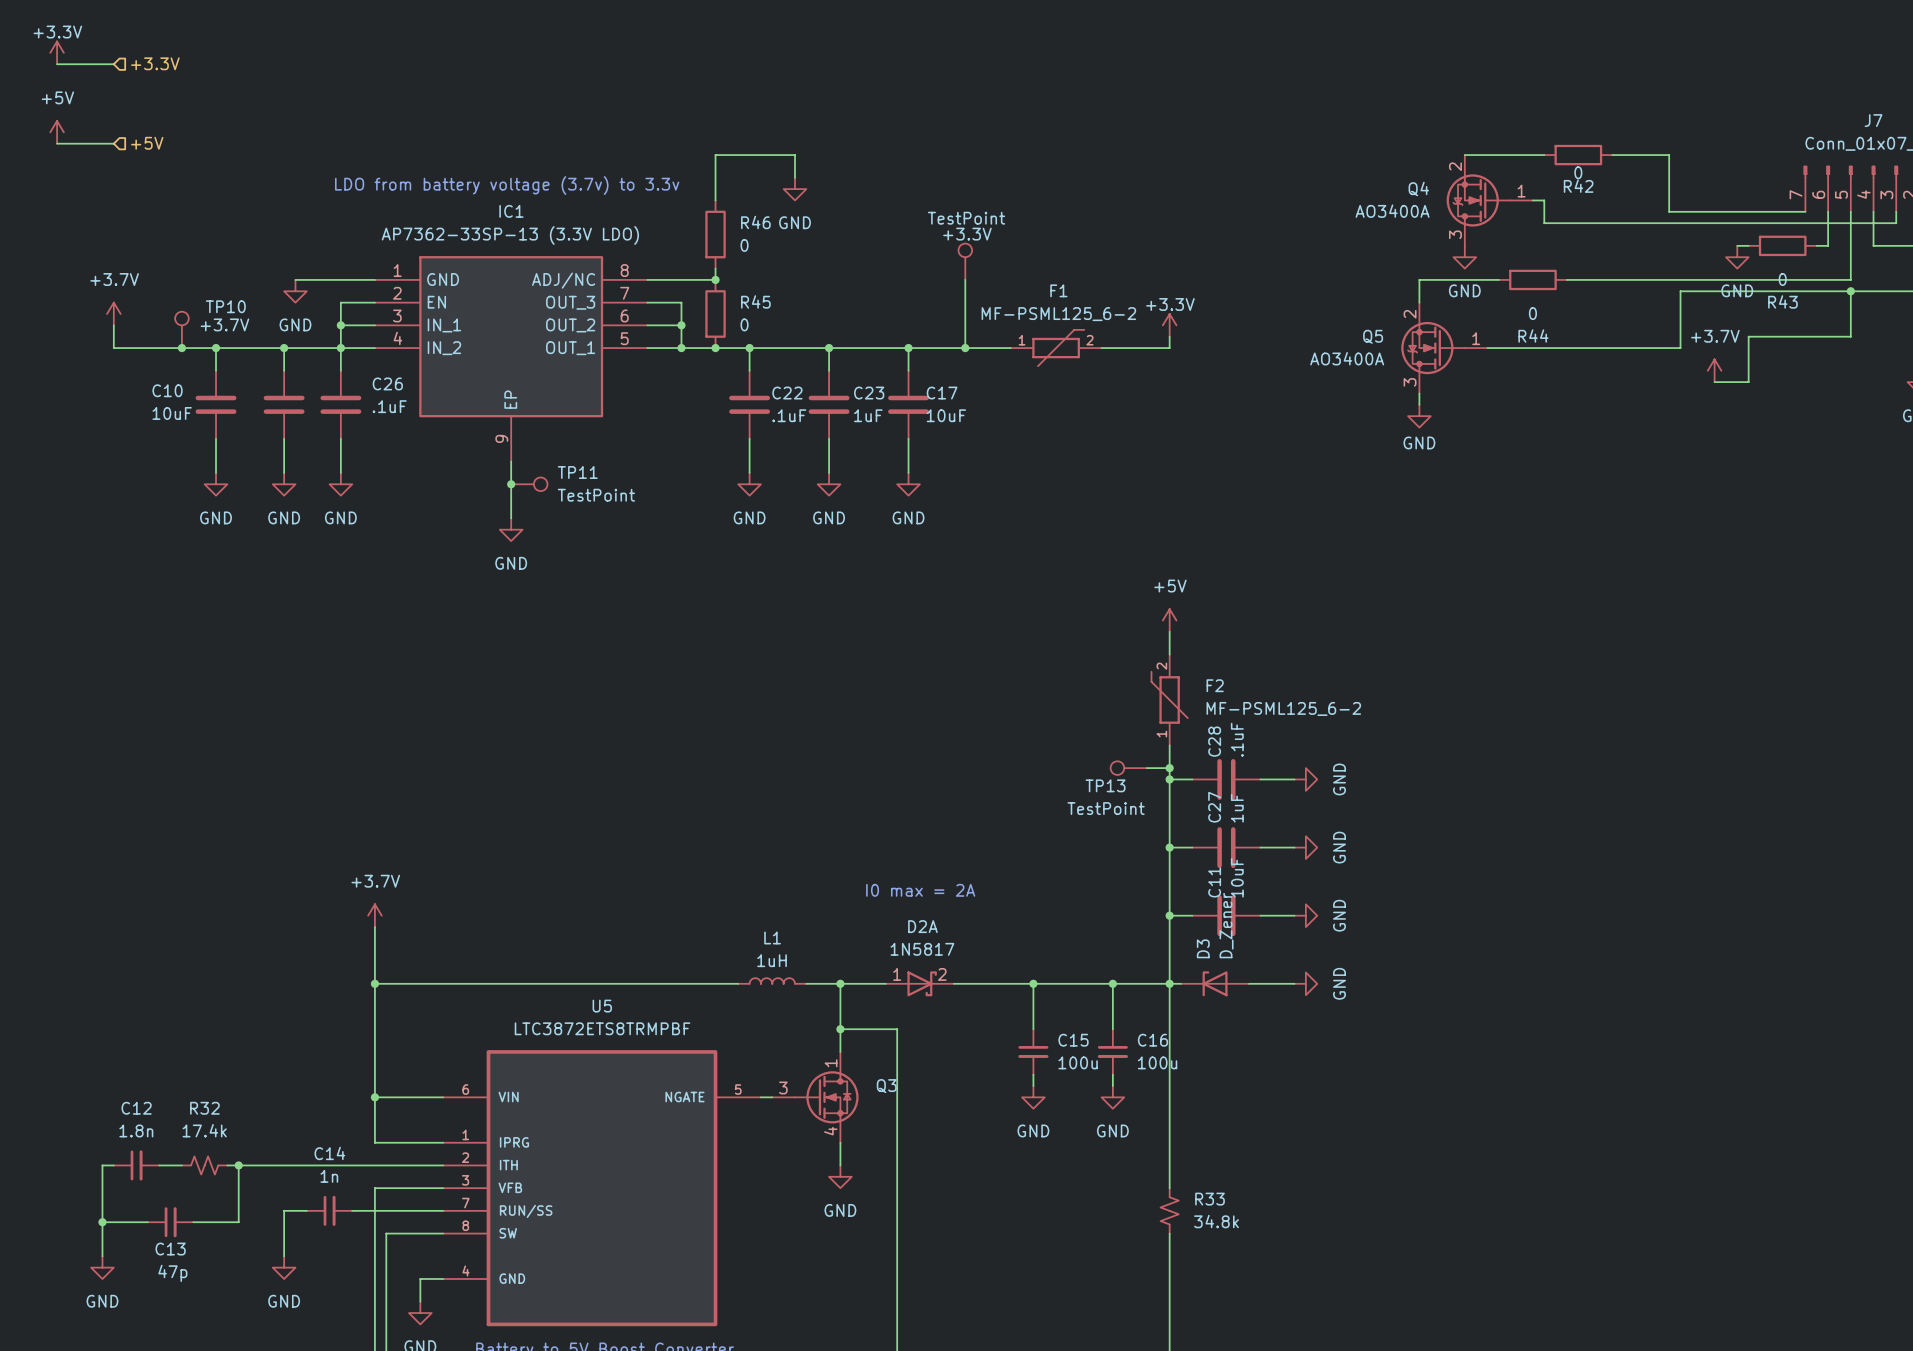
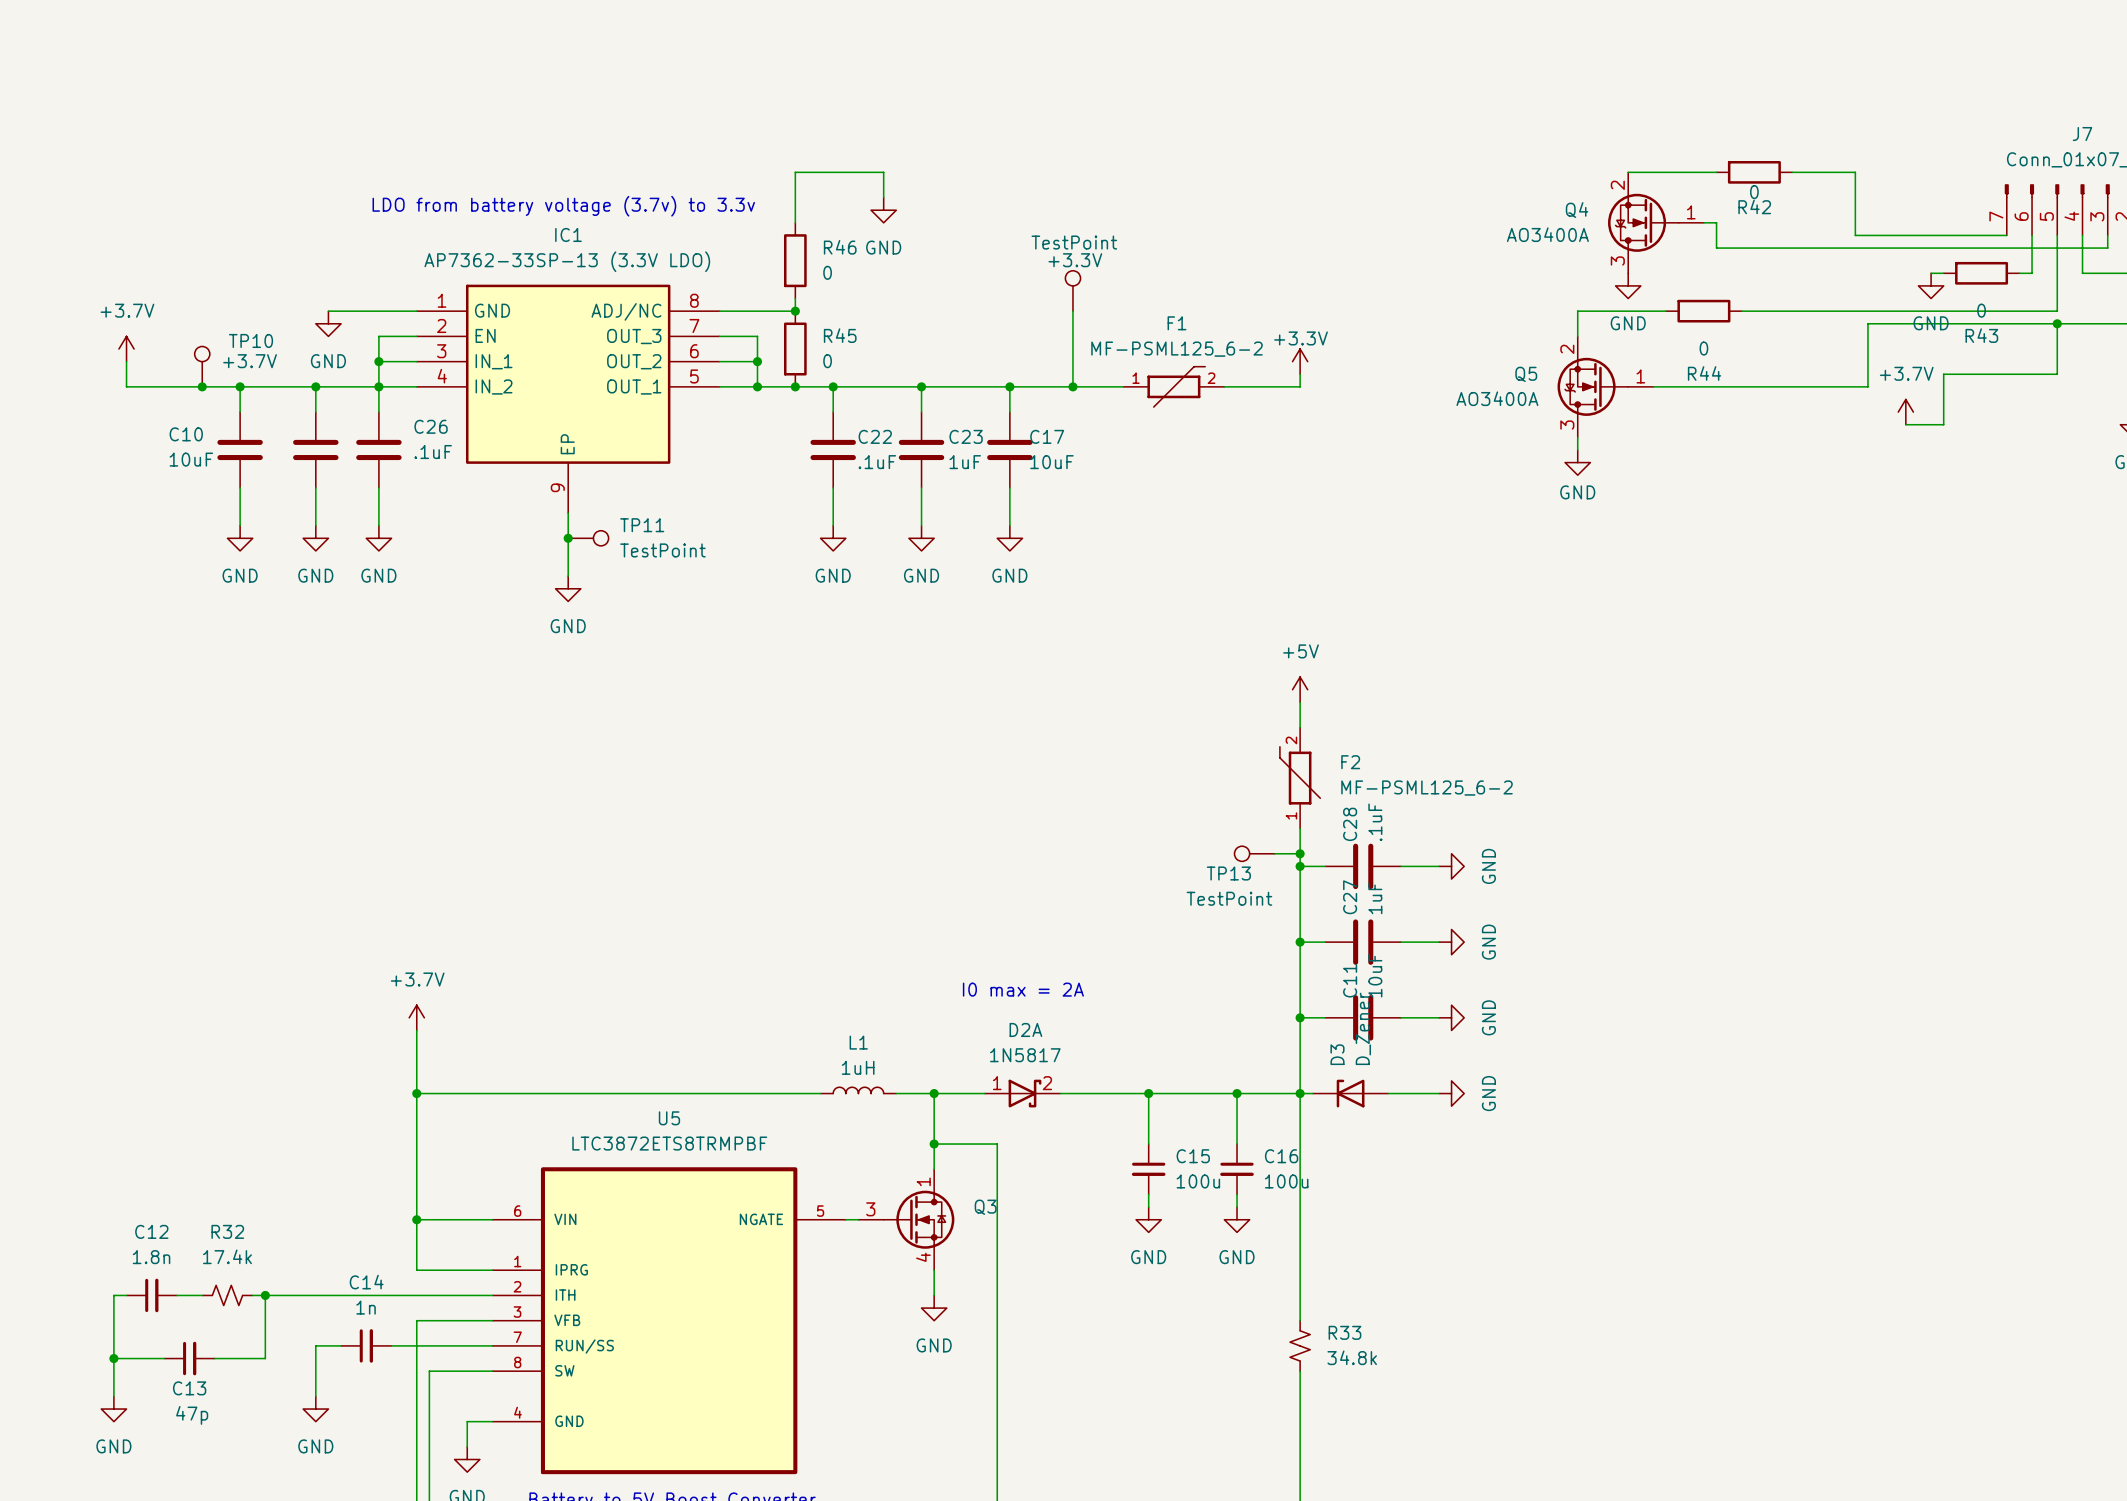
power symbol: +3.3V (57, 52) -> none
hierarchical label: +3.3V (155, 63) -> none
wire: (57, 64) (113, 64) -> none
power symbol: +5V (57, 132) -> none
wire: (57, 143) (113, 143) -> none
hierarchical label: +5V (147, 143) -> none

